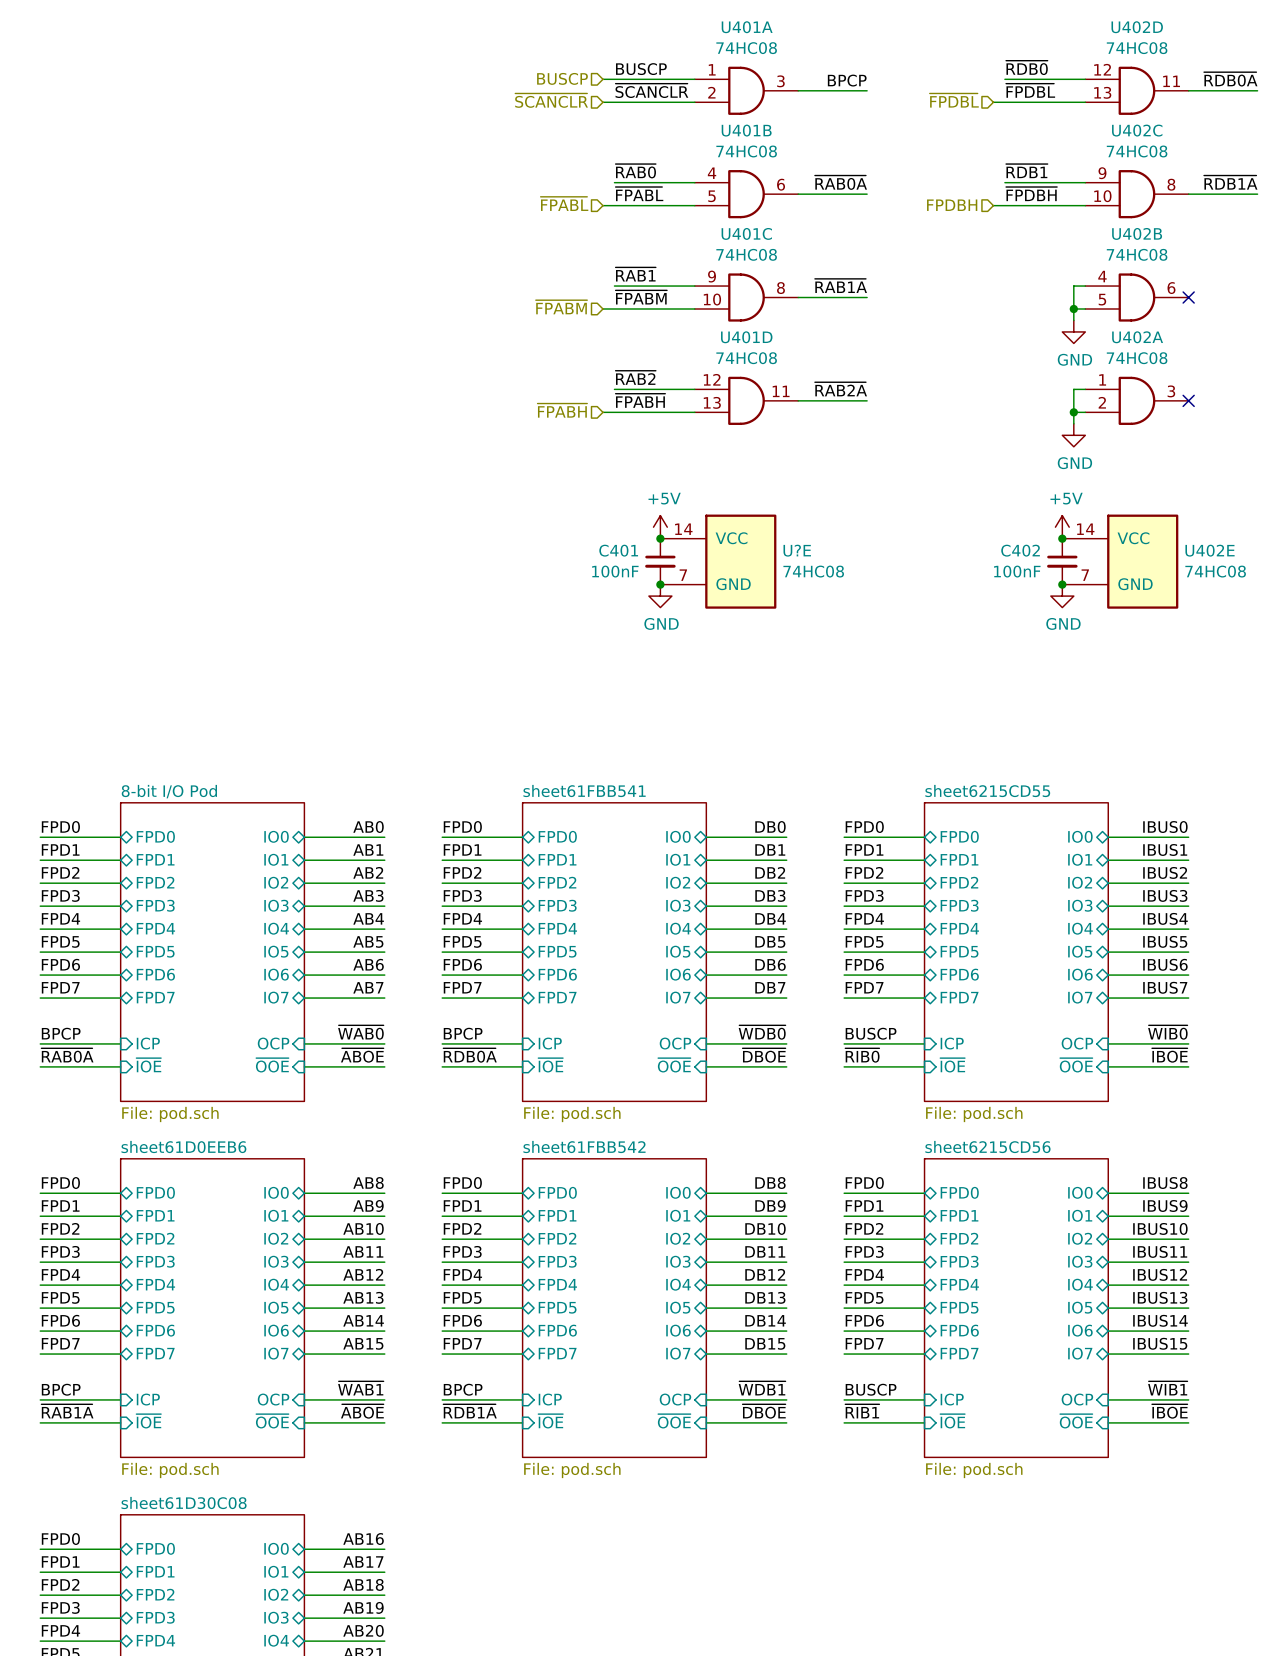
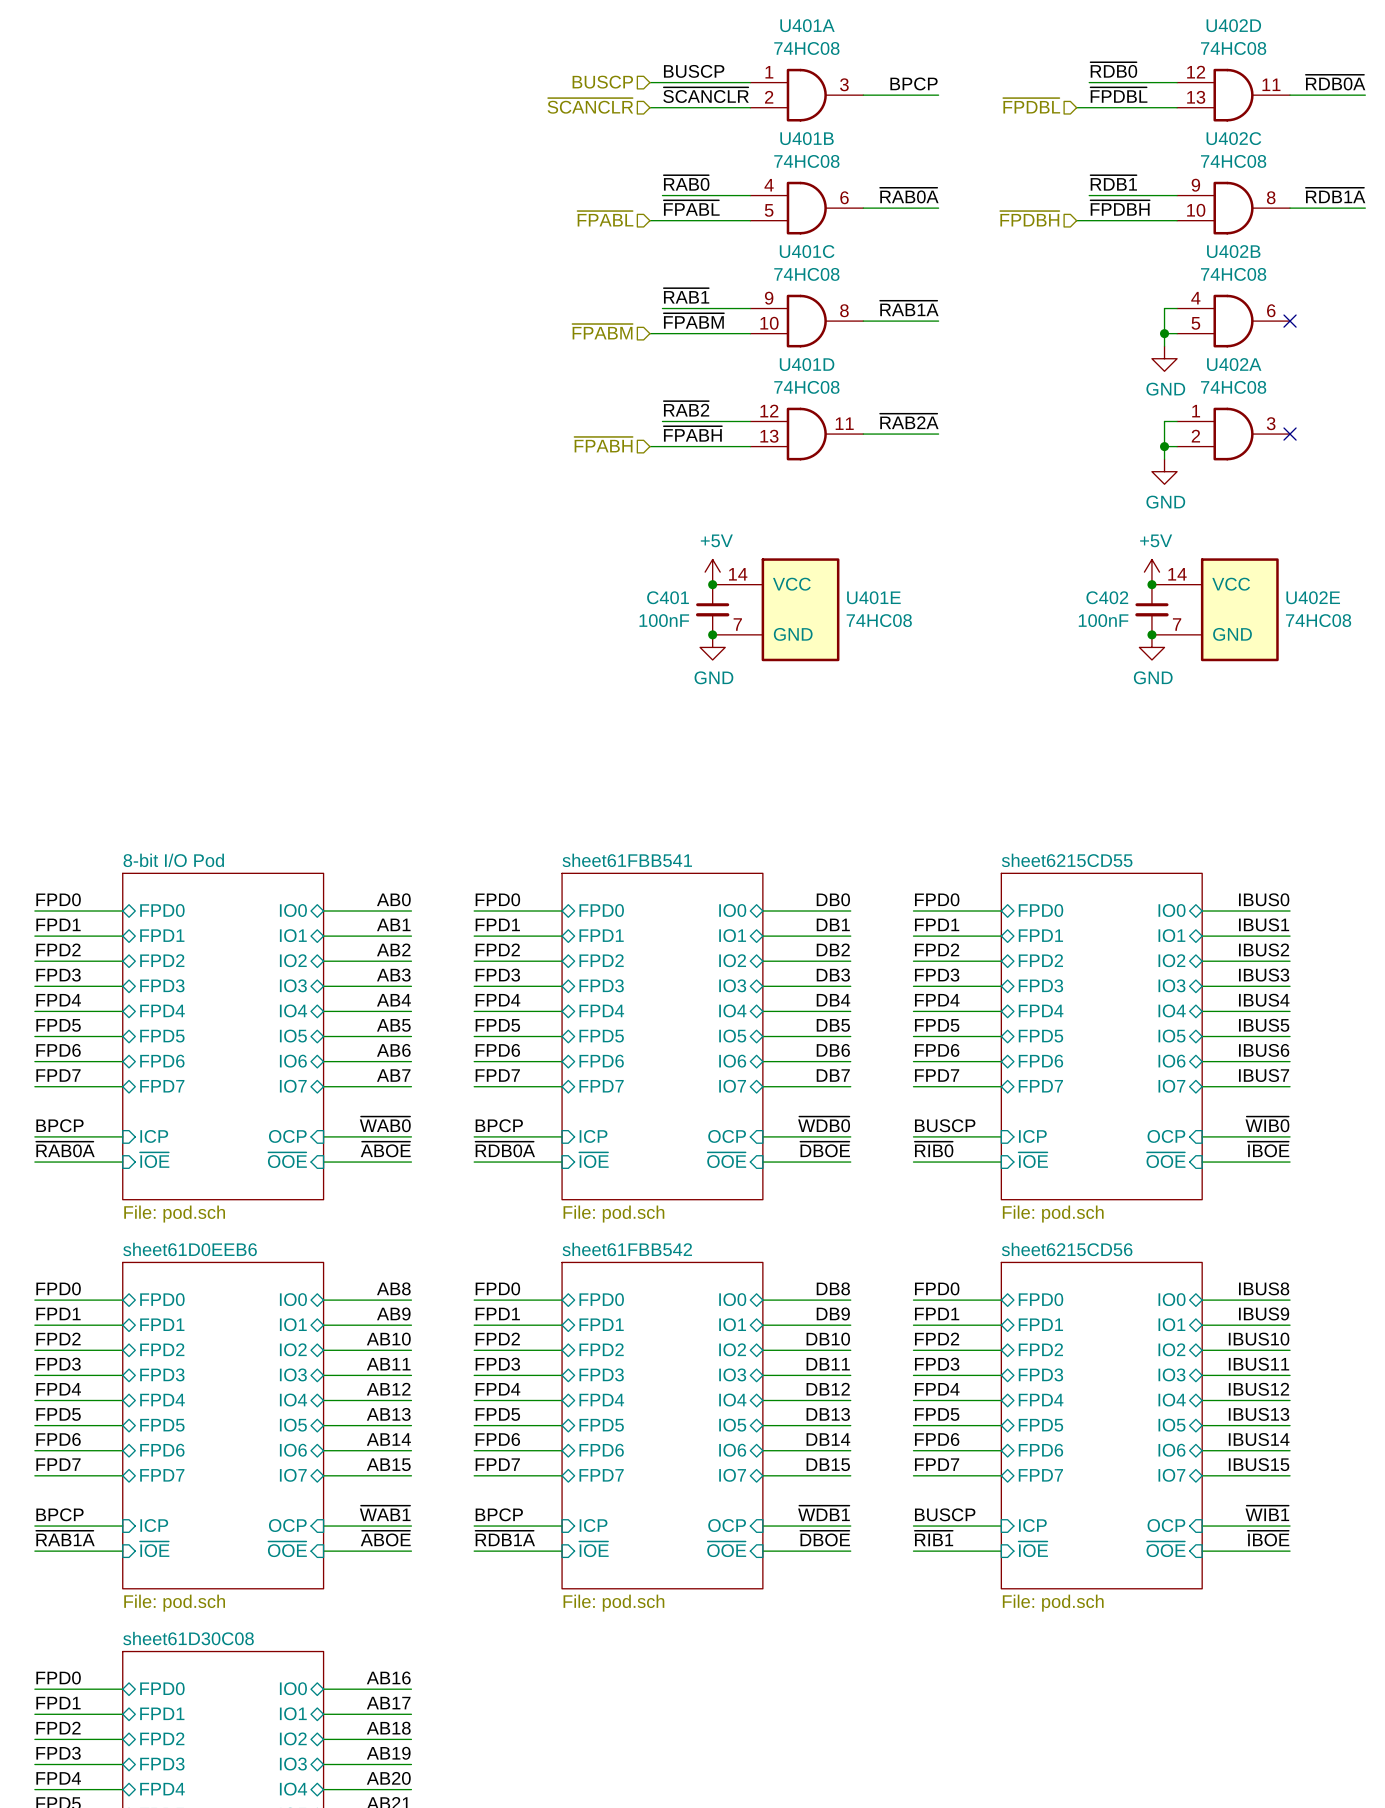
hierarchical label: FPDBH (952, 205) -> ~{FPDBH} (1029, 218)
U?E name: U?E (797, 550) -> U401E (873, 597)

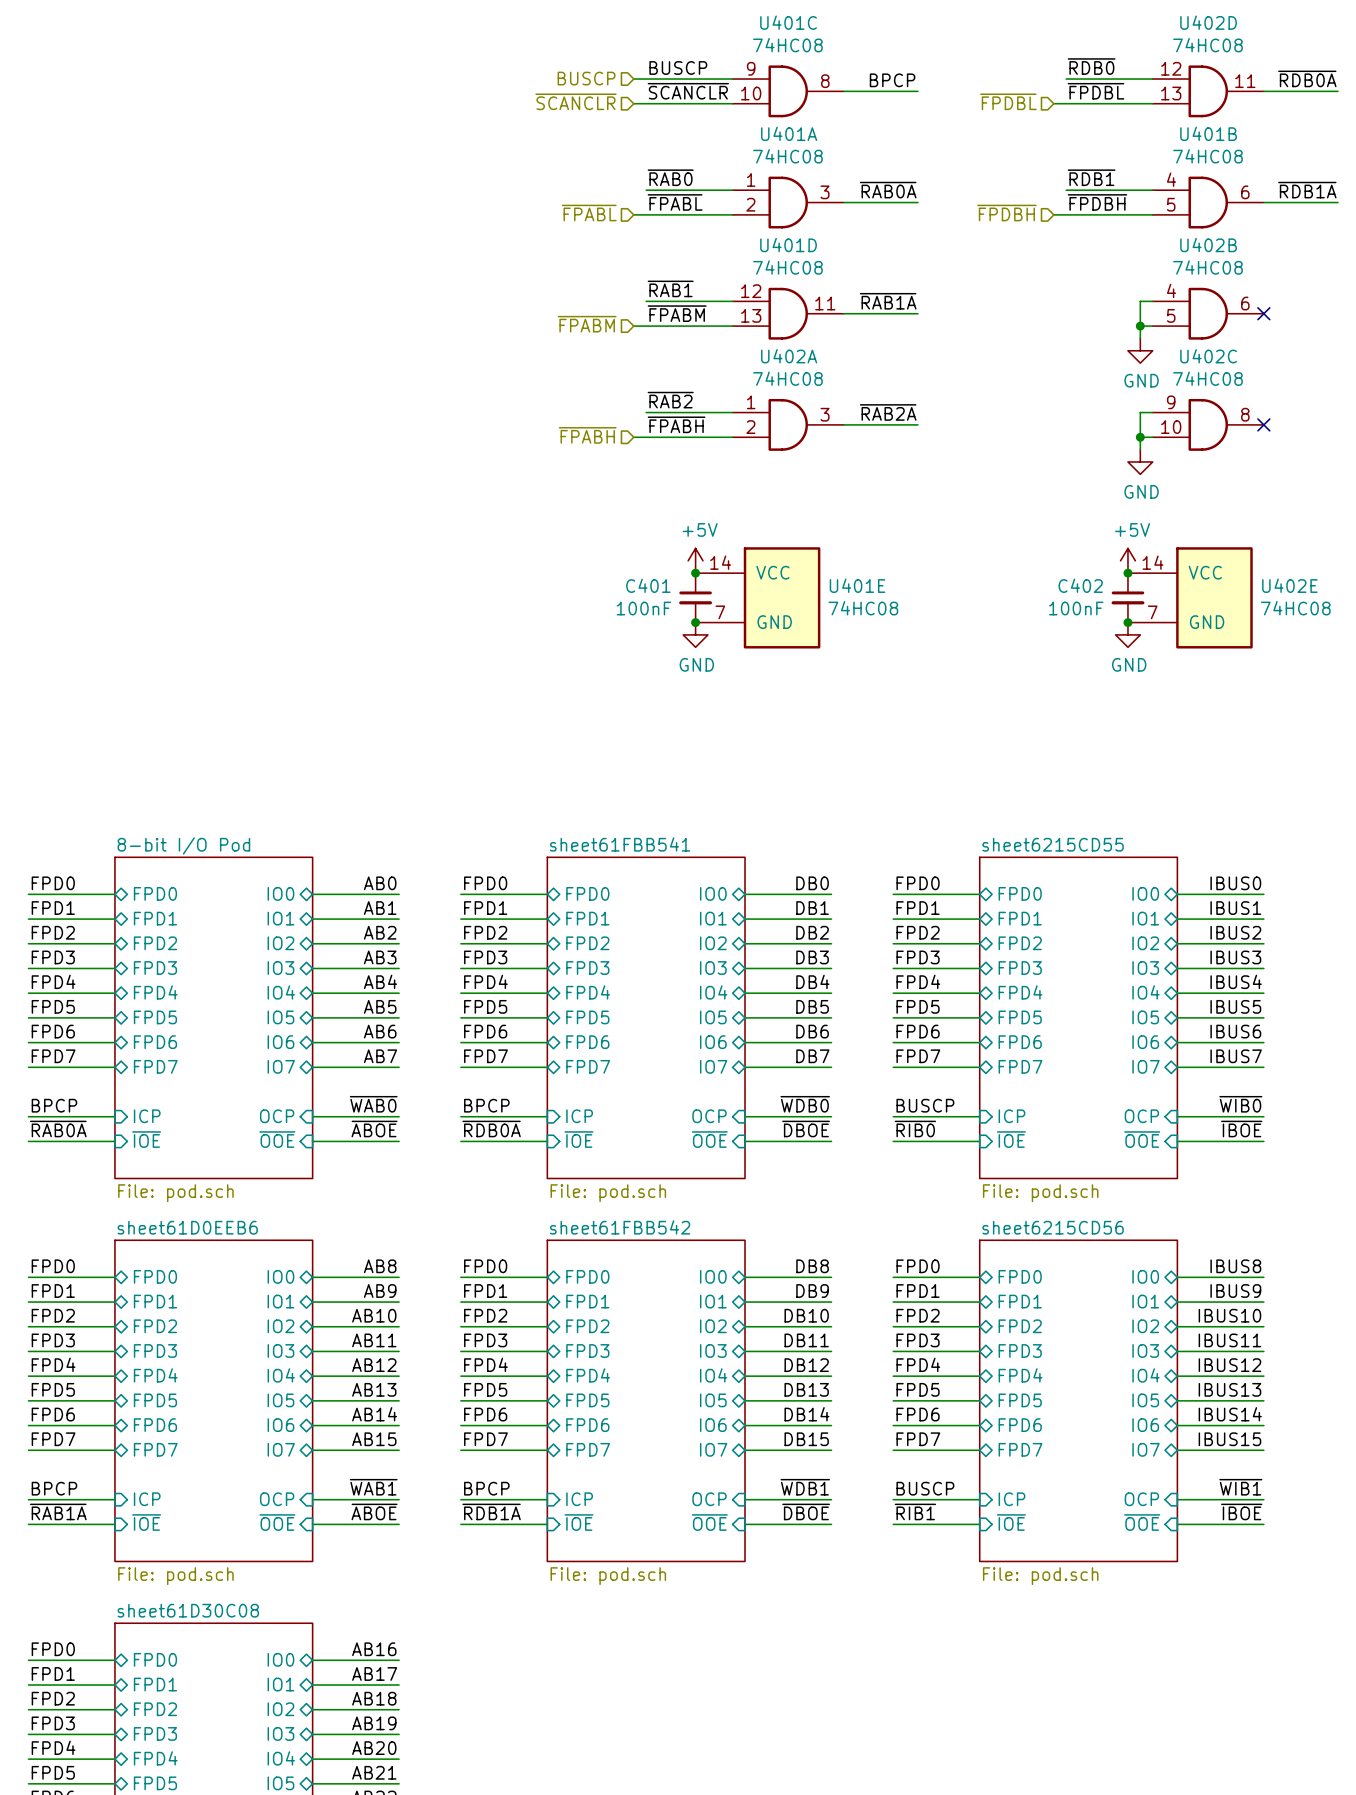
U401A position: (806, 95) -> (788, 202)
U401B position: (806, 208) -> (1208, 202)
U402C position: (1233, 208) -> (1208, 424)
U401C position: (806, 321) -> (788, 91)
U401D position: (806, 434) -> (788, 313)
U402A position: (1233, 434) -> (788, 424)

